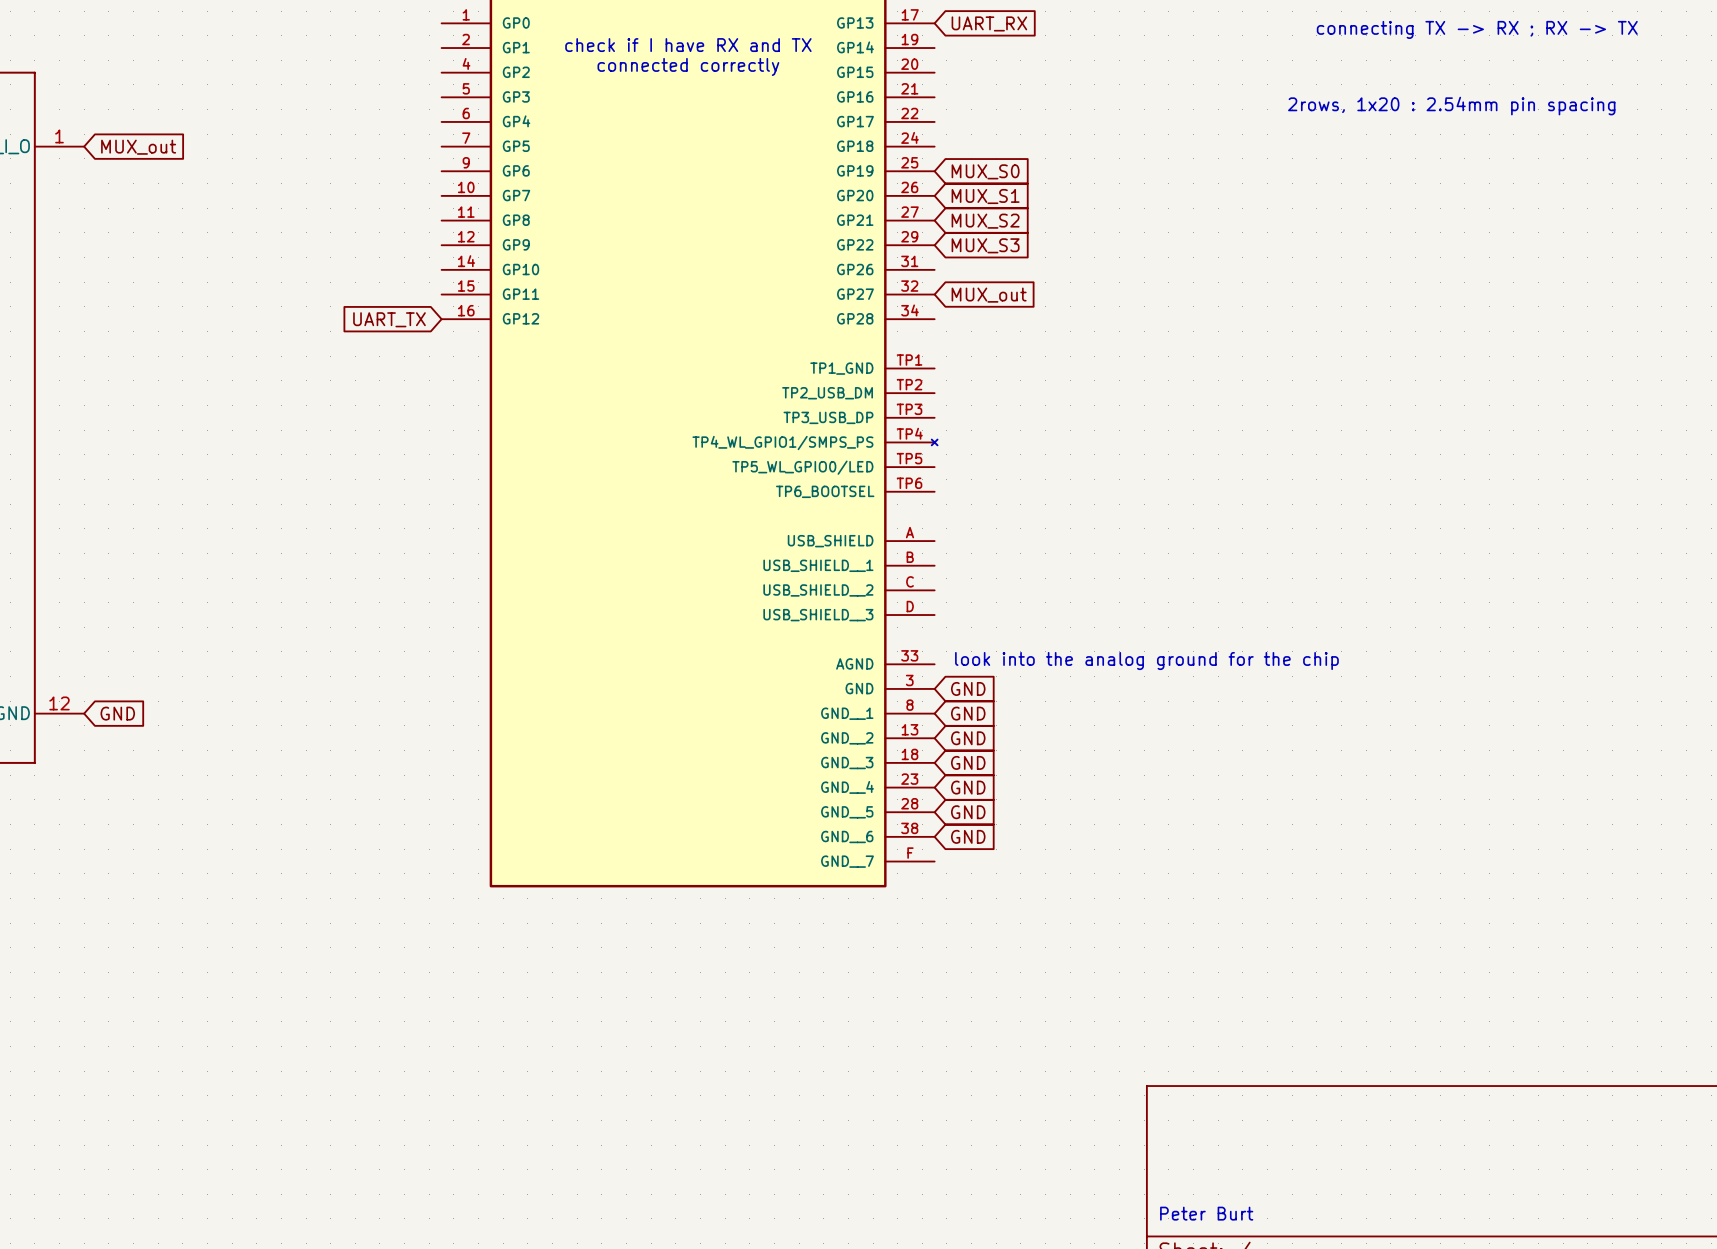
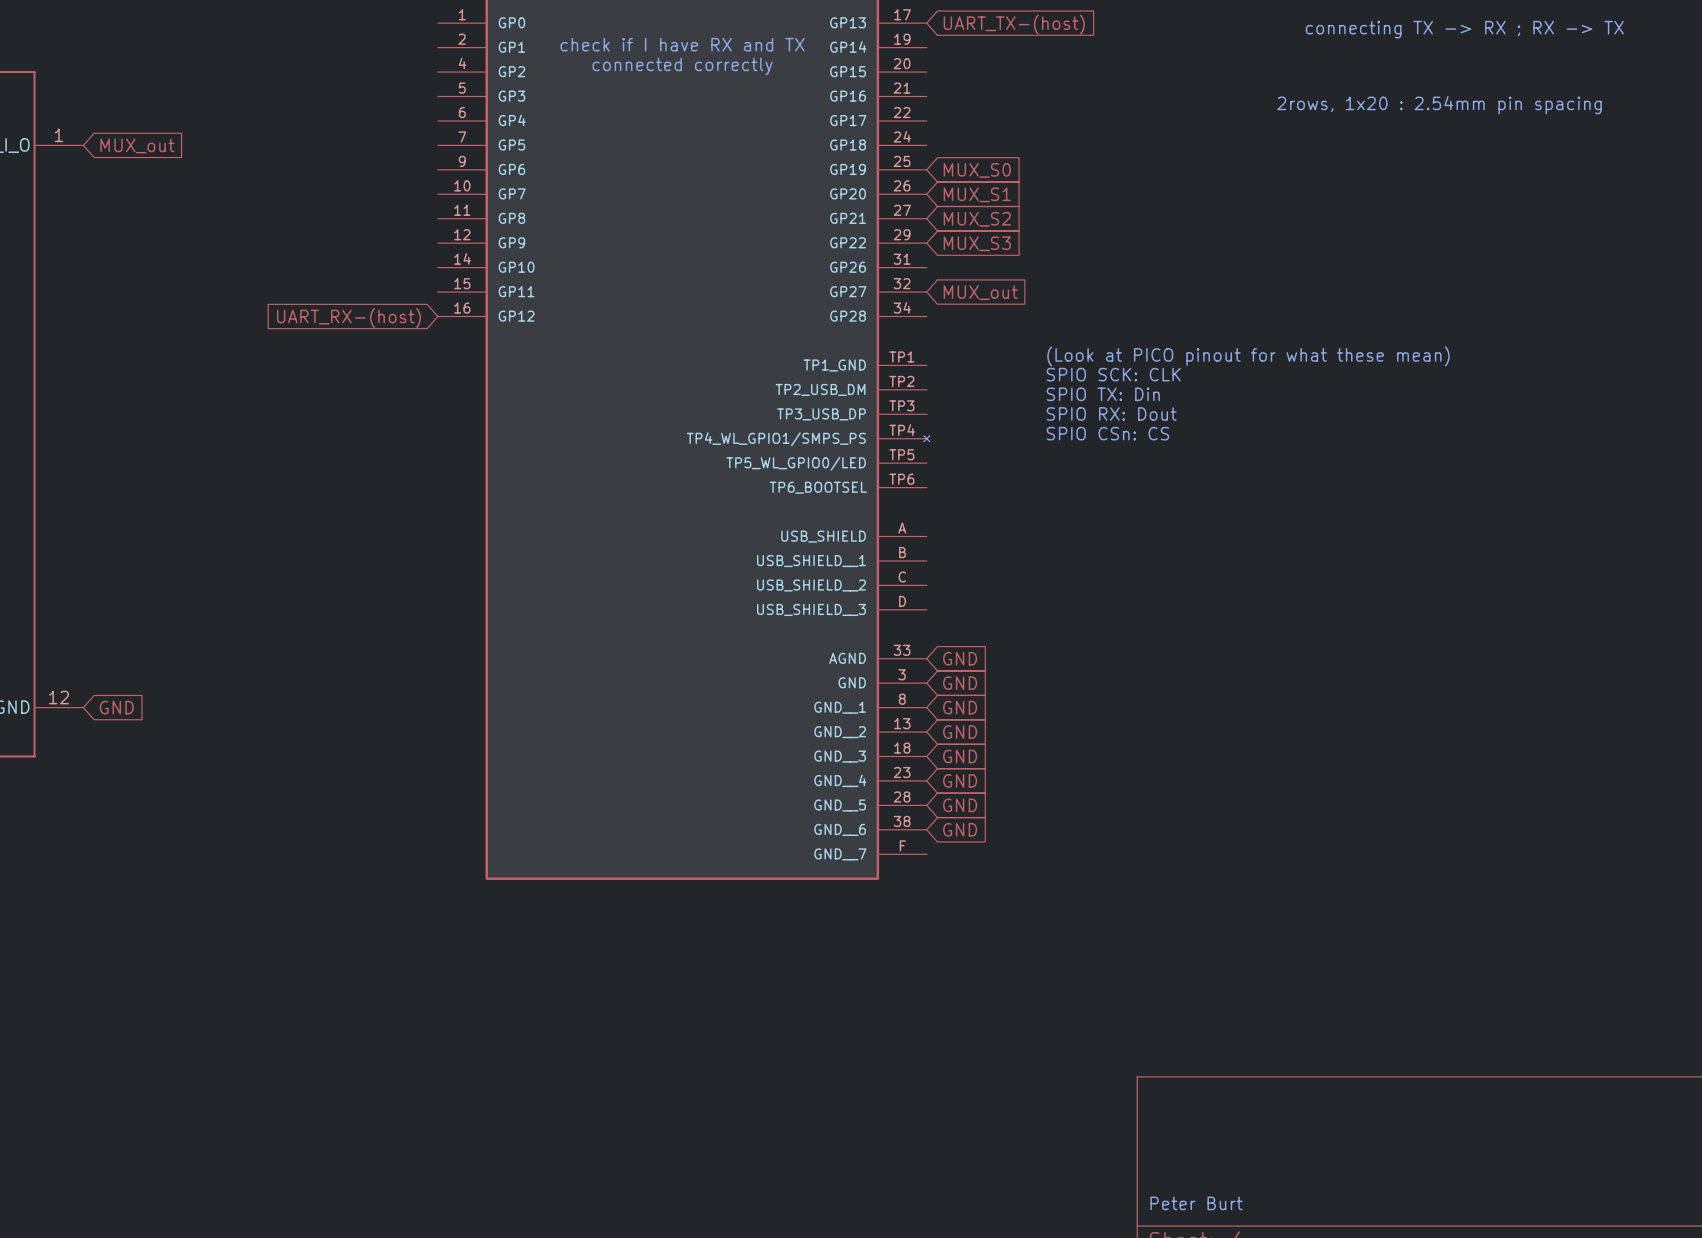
global label: UART_RX (989, 23) -> UART_TX-(host) (1014, 24)
global label: UART_TX (389, 319) -> UART_RX-(host) (348, 317)
text: none -> (Look at PICO pinout for what these mean) (1248, 356)
text: none -> SPIO SCK: CLK (1113, 374)
text: none -> SPIO TX: Din (1103, 394)
text: none -> SPIO RX: Dout (1111, 413)
text: none -> SPIO CSn: CS (1107, 433)
text: look into the analog ground for the chip (1146, 661) -> none
global label: none -> GND (960, 658)

